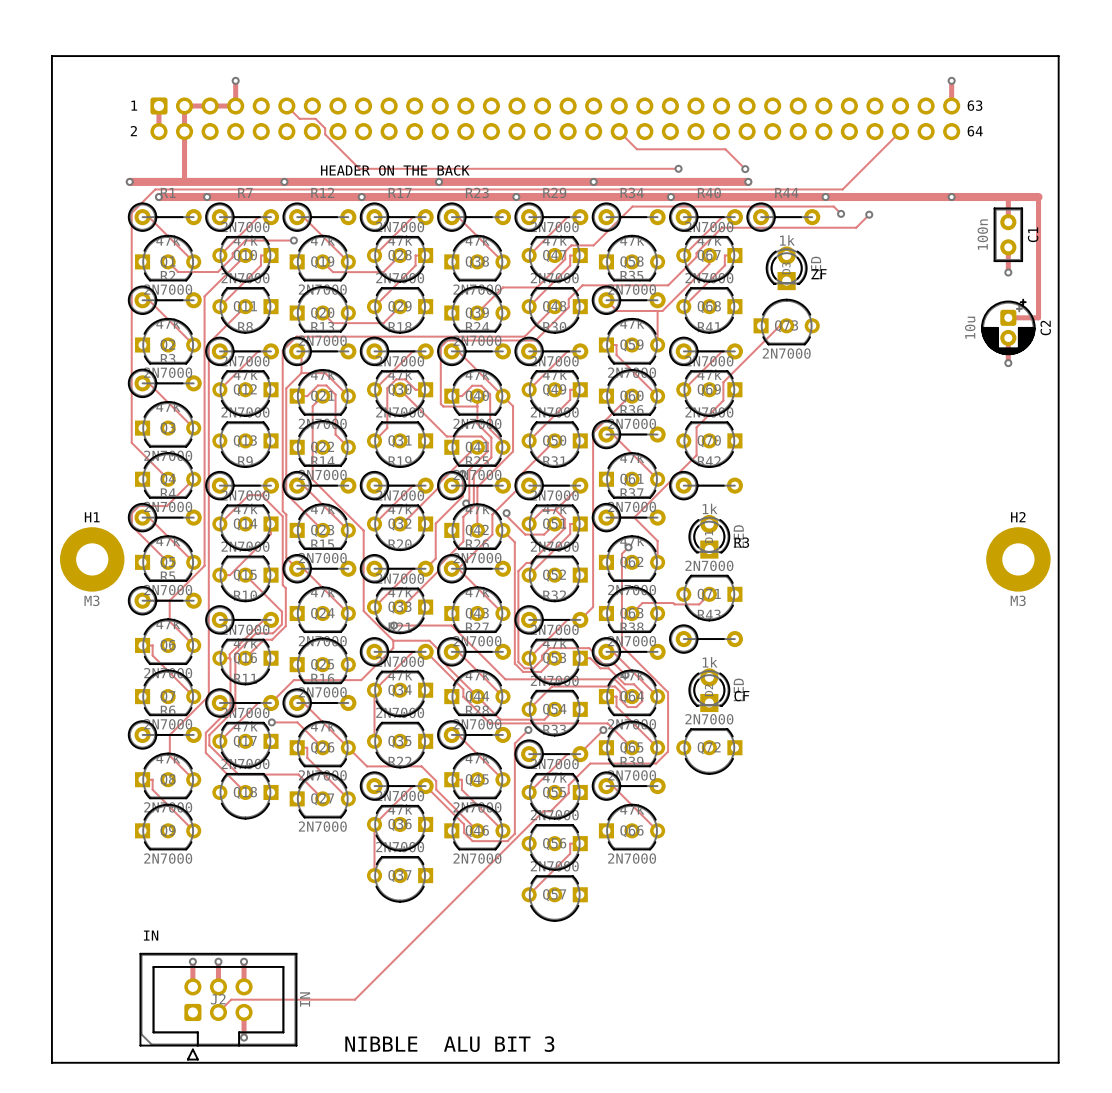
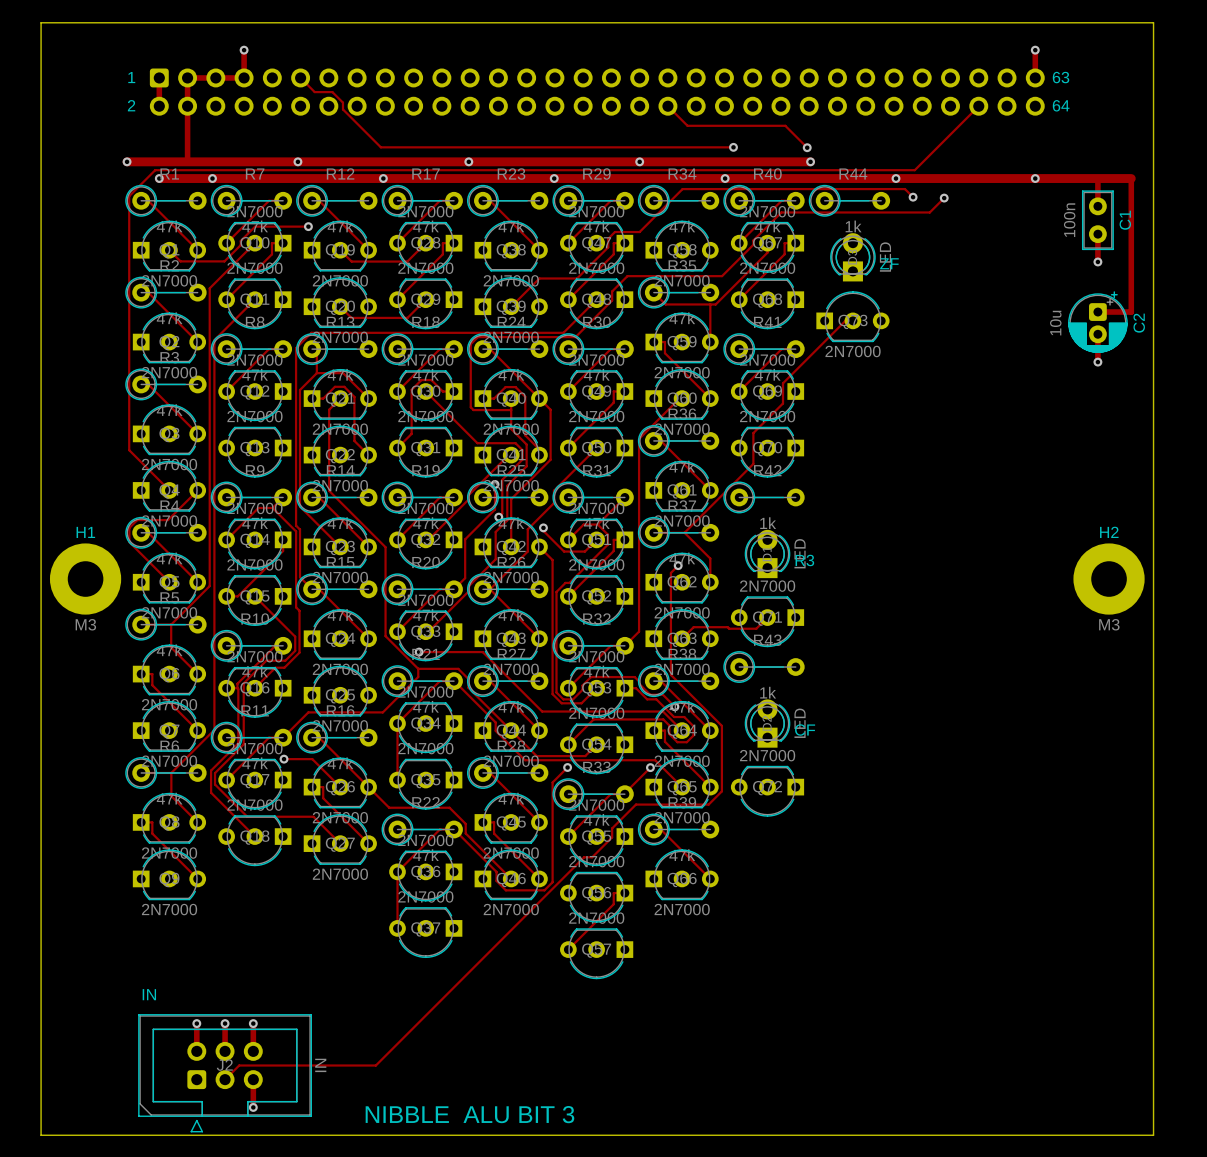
text: HEADER ON THE BACK (395, 170) -> none

